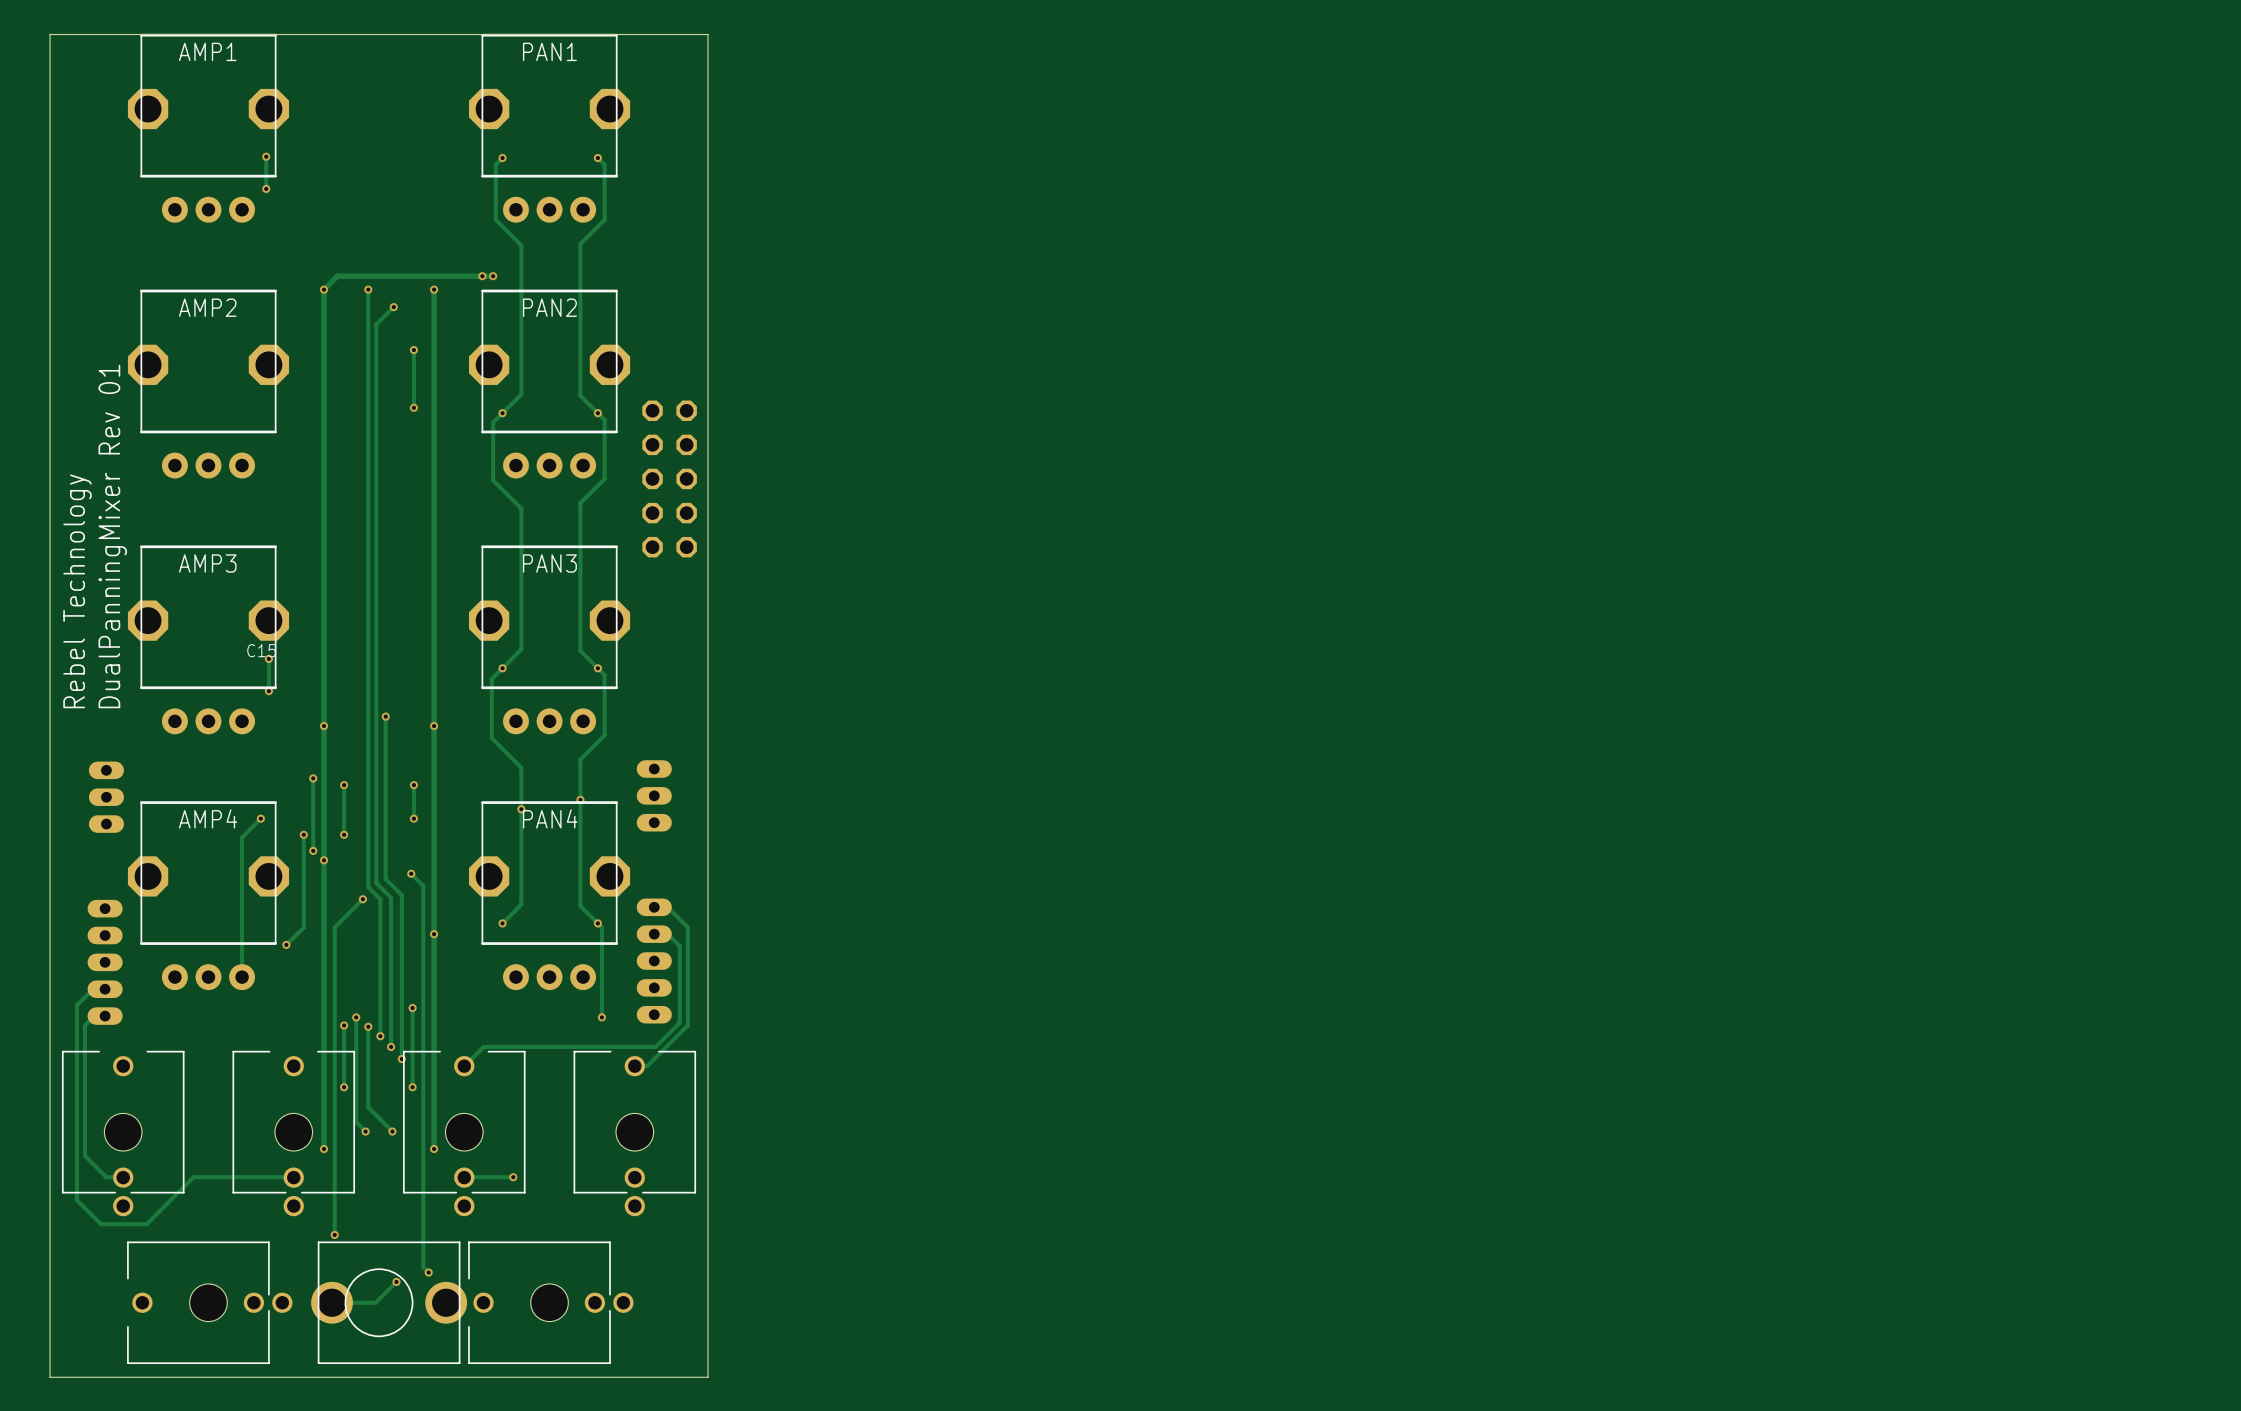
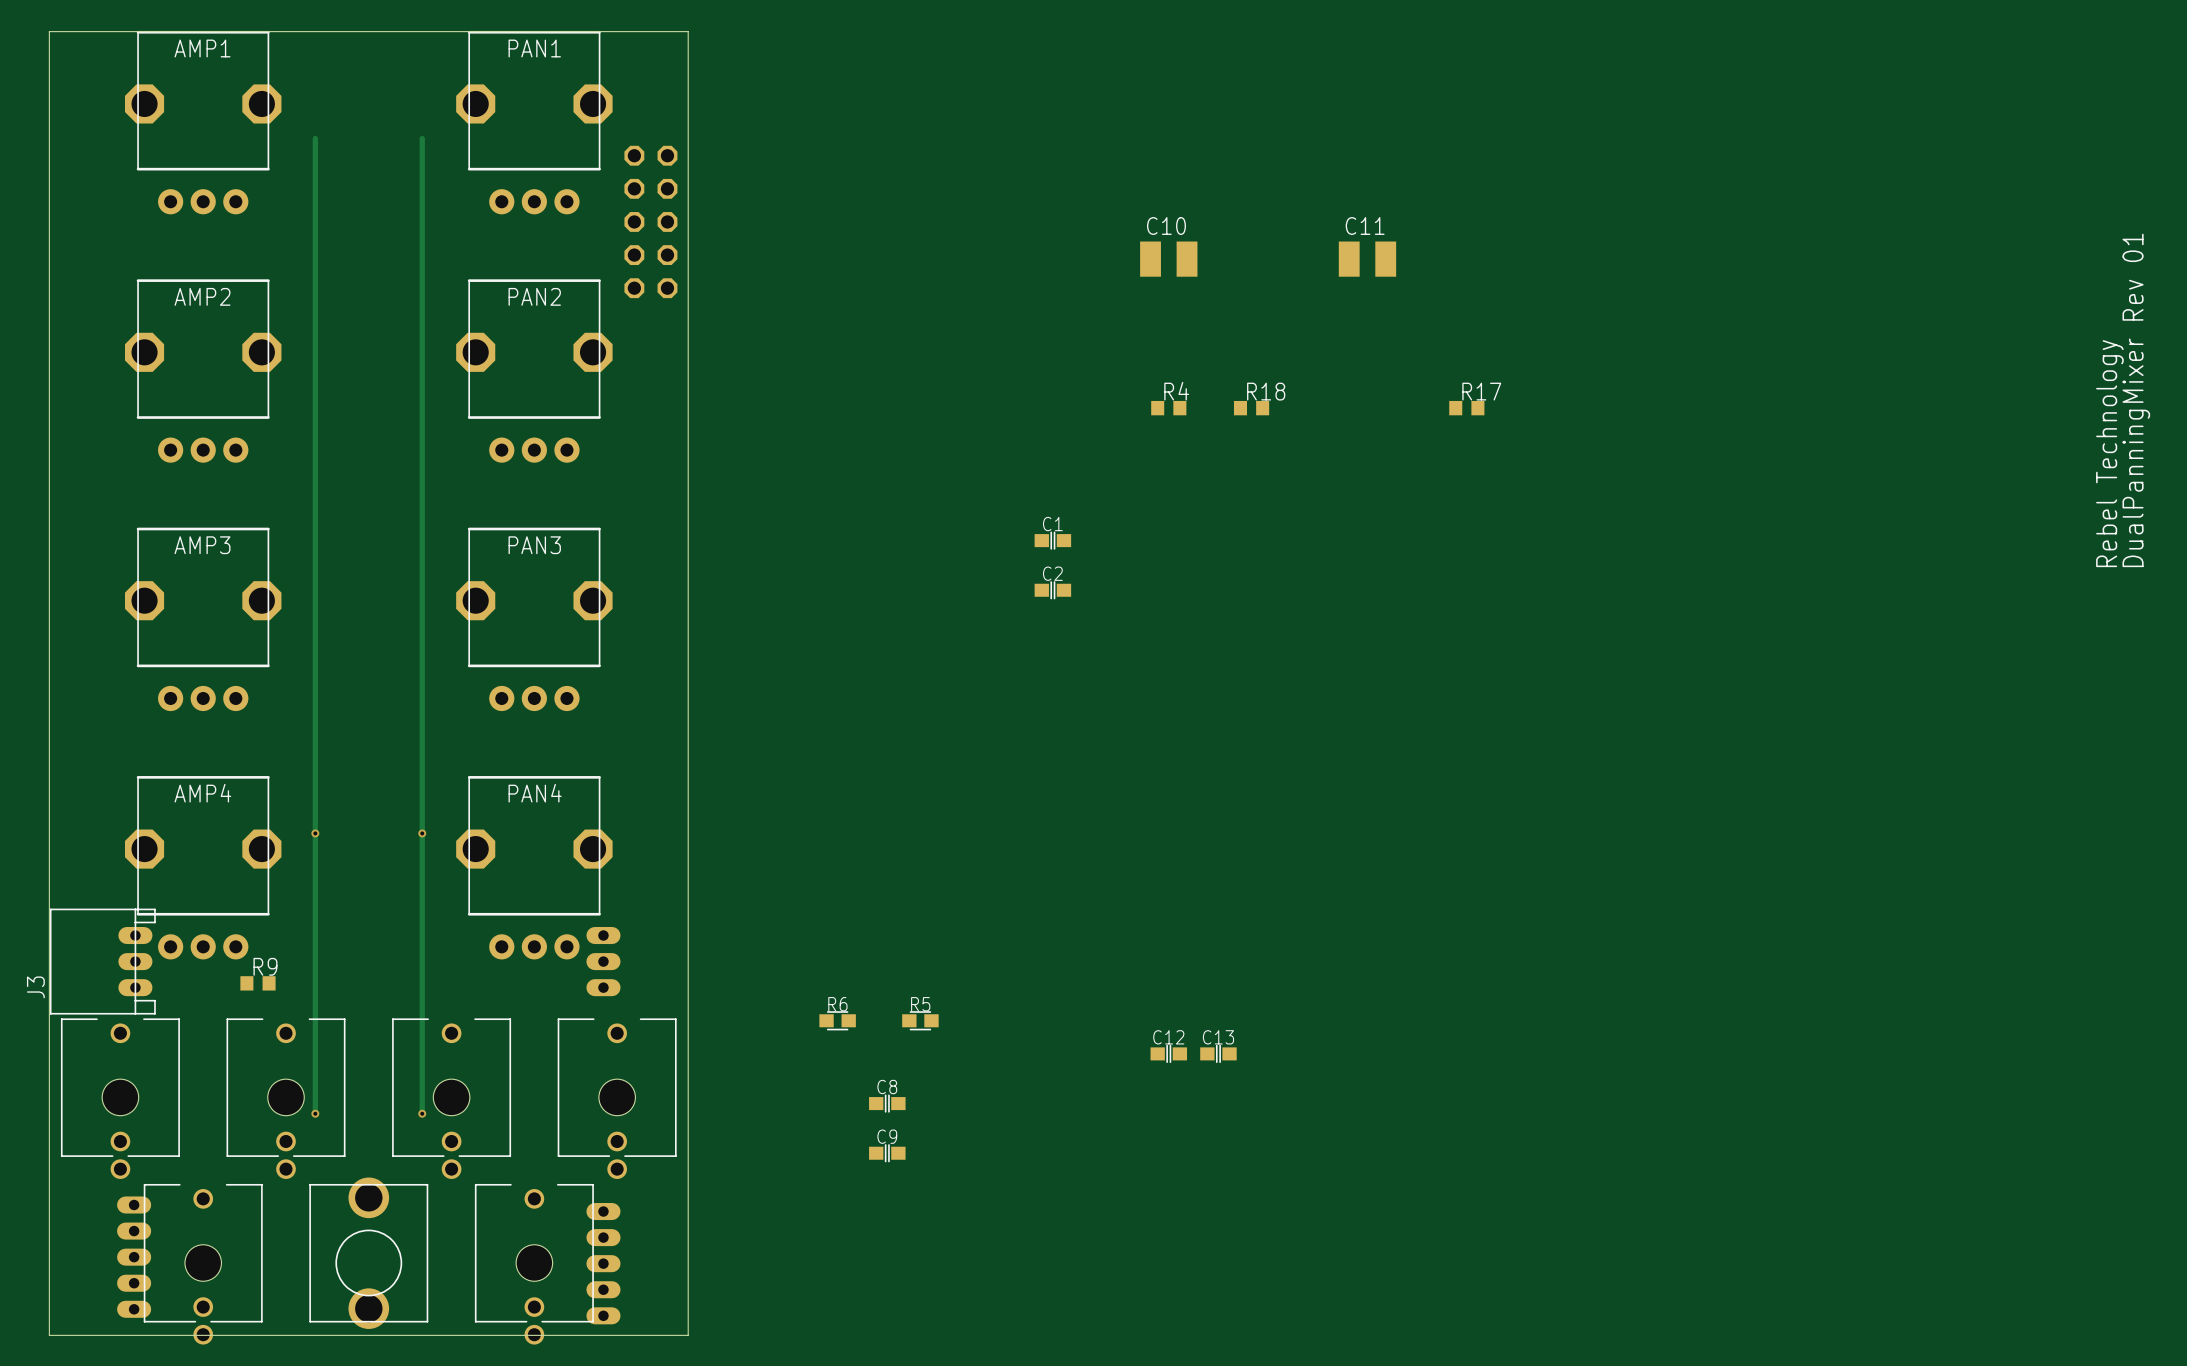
track: none -> (422, 138) (422, 279)
track: (266, 156) (266, 188) -> none
via: (266, 156) -> none
track: (502, 158) (495, 164) (495, 219) (521, 245) (521, 394) (493, 422) (493, 480) (521, 508) (521, 649) (491, 679) (491, 738) (521, 767) (521, 904) (502, 923) -> none
via: (502, 158) -> none
track: (597, 158) (604, 164) (604, 219) (580, 243) (580, 395) (604, 419) (604, 478) (580, 503) (580, 650) (604, 675) (604, 735) (580, 759) (580, 905) (601, 927) (601, 1017) -> none
via: (597, 158) -> none
via: (266, 188) -> none
C10: none -> (1168, 259)
C11: none -> (1367, 259)
via: (482, 276) -> none
track: (493, 276) (337, 276) (323, 289) -> (315, 138) (315, 279)
via: (493, 276) -> none
via: (323, 289) -> none
track: (368, 289) (368, 887) (380, 899) (380, 1036) -> none
via: (368, 289) -> none
via: (434, 289) -> none
track: (393, 307) (376, 324) (376, 883) (391, 897) (391, 1046) -> none
via: (393, 307) -> none
track: (413, 350) (413, 407) -> none
via: (413, 350) -> none
via: (413, 407) -> none
via: (502, 413) -> none
via: (597, 413) -> none
text: none -> DualPanningMixer Rev 01 (2136, 400)
R4: none -> (1168, 408)
R18: none -> (1251, 408)
R17: none -> (1466, 408)
text: none -> Rebel Technology (2109, 453)
part position: (669, 478) -> (650, 221)
text: DualPanningMixer Rev 01 (112, 536) -> none
C1: none -> (1052, 540)
text: Rebel Technology (77, 591) -> none
C2: none -> (1052, 590)
C15: (261, 650) -> none
track: (268, 658) (268, 691) -> none
via: (268, 658) -> none
via: (502, 668) -> none
via: (597, 668) -> none
via: (268, 691) -> none
track: (385, 716) (385, 879) (401, 895) (401, 1059) -> none
via: (385, 716) -> none
via: (323, 726) -> none
via: (434, 726) -> none
track: (313, 778) (313, 850) -> none
via: (313, 778) -> none
track: (344, 785) (344, 834) -> none
via: (344, 785) -> none
track: (413, 785) (413, 818) -> none
via: (413, 785) -> none
part position: (654, 795) -> (603, 961)
part: (106, 797) -> none
via: (580, 799) -> none
via: (521, 809) -> none
track: (260, 818) (242, 837) (242, 977) -> none
via: (260, 818) -> none
via: (413, 818) -> none
track: (303, 834) (303, 927) (286, 944) -> none
via: (303, 834) -> none
via: (344, 834) -> none
via: (313, 850) -> none
via: none -> (422, 833)
track: (411, 873) (423, 885) (423, 1267) (428, 1272) -> none
via: (411, 873) -> none
track: (362, 899) (334, 927) (334, 1234) -> none
via: (362, 899) -> none
track: (654, 907) (667, 907) (687, 927) (687, 1025) (647, 1066) (634, 1066) -> none
via: (502, 923) -> none
via: (597, 923) -> none
via: (434, 934) -> none
track: (654, 934) (667, 934) (679, 946) (679, 1022) (655, 1046) (483, 1046) (464, 1065) -> none
via: (286, 944) -> none
part: (654, 961) -> none
part: (105, 962) -> none
track: (105, 989) (93, 989) (76, 1005) (76, 1200) (101, 1224) (146, 1224) (193, 1177) (293, 1177) -> none
J3: none -> (102, 961)
track: (412, 1008) (412, 1087) -> none
via: (412, 1008) -> none
R9: none -> (257, 983)
track: (105, 1016) (94, 1016) (84, 1025) (84, 1155) (106, 1177) (123, 1177) -> none
track: (356, 1017) (356, 1122) (365, 1131) -> none
via: (356, 1017) -> none
via: (601, 1017) -> none
track: (344, 1025) (344, 1087) -> none
via: (344, 1025) -> none
track: (368, 1026) (368, 1107) (392, 1131) -> none
via: (368, 1026) -> none
via: (380, 1036) -> none
via: (391, 1046) -> none
R6: none -> (837, 1020)
R5: none -> (920, 1020)
via: (401, 1059) -> none
via: (344, 1087) -> none
via: (412, 1087) -> none
C12: none -> (1168, 1053)
C13: none -> (1218, 1053)
via: (365, 1131) -> none
via: (392, 1131) -> none
C8: none -> (887, 1103)
track: (513, 1177) (464, 1177) -> none
via: (513, 1177) -> none
C9: none -> (887, 1153)
via: (334, 1234) -> none
via: (428, 1272) -> none
track: (396, 1281) (375, 1302) (332, 1302) -> none
via: (396, 1281) -> none
part: none -> (134, 1257)
part rotation: 0° (209, 1302) -> 90° clockwise (203, 1264)
part rotation: 0° (389, 1302) -> 90° counterclockwise (368, 1253)
part rotation: 0° (550, 1302) -> 90° clockwise (534, 1264)
part: none -> (603, 1263)

